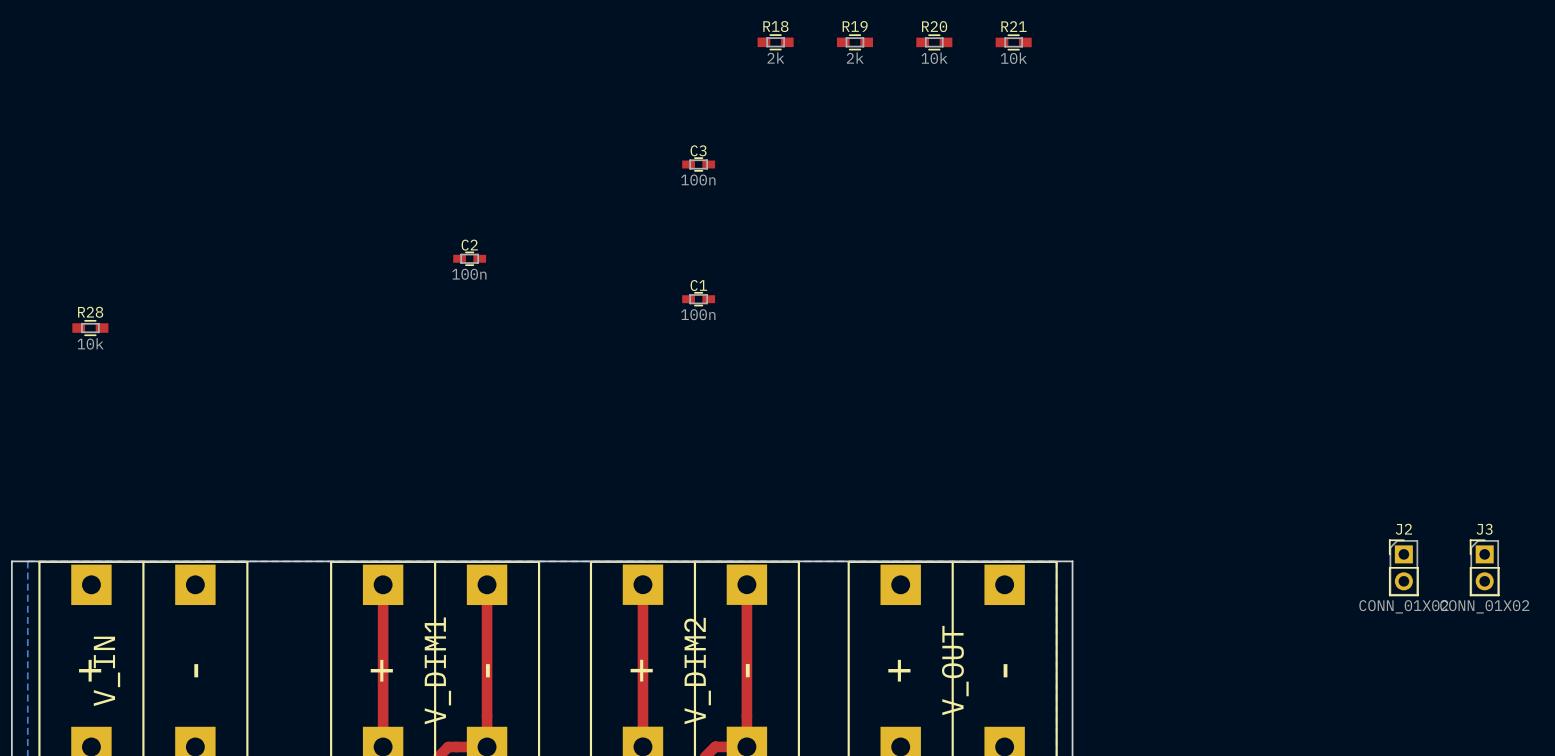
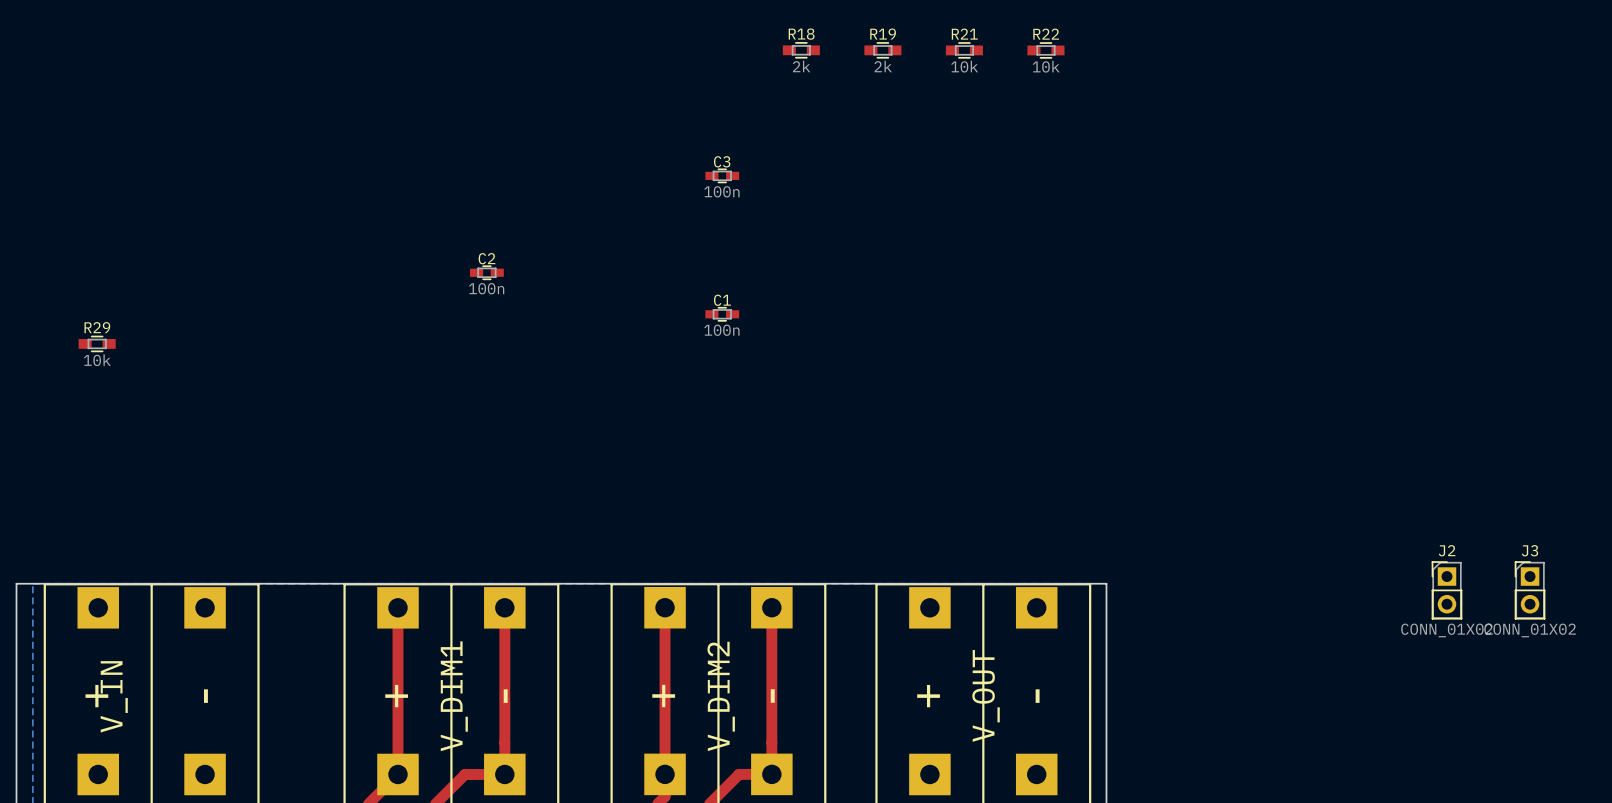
R20 name: R20 (934, 26) -> R21 (964, 34)
R21 name: R21 (1013, 26) -> R22 (1046, 34)
R28 name: R28 (90, 312) -> R29 (97, 327)

